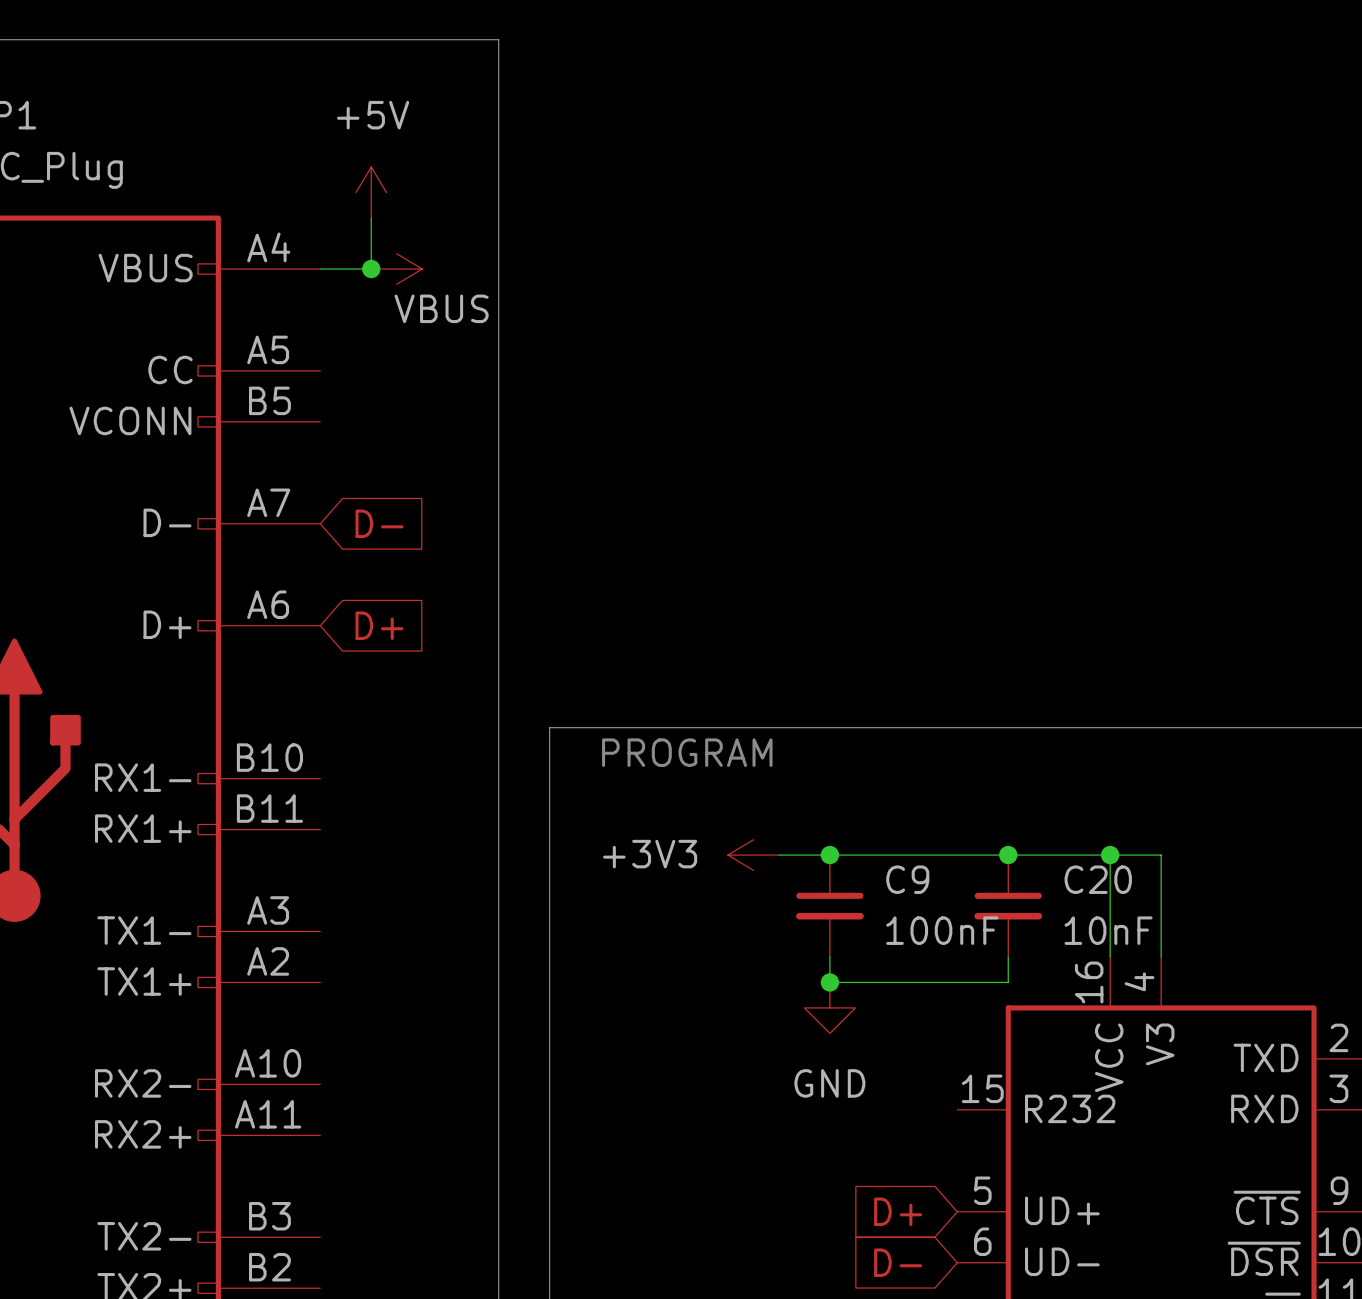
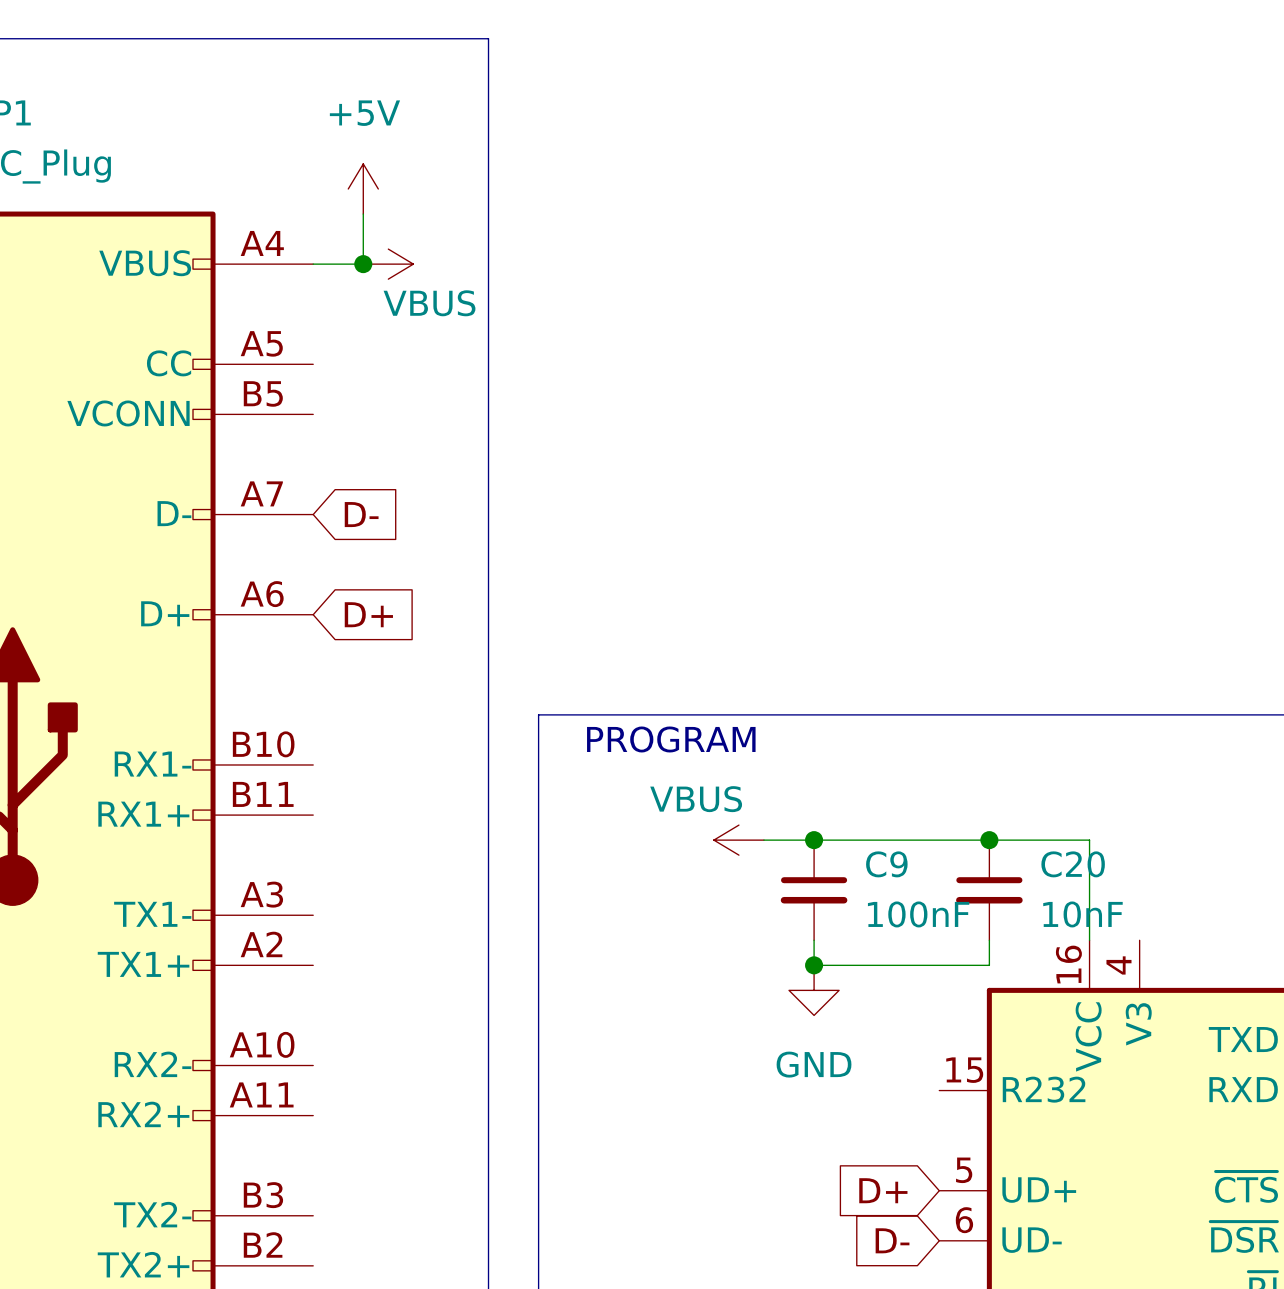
power symbol: +3V3 (753, 855) -> VBUS (738, 840)
wire: (1110, 855) (1161, 855) (1161, 956) -> none
junction: (1110, 855) -> none

